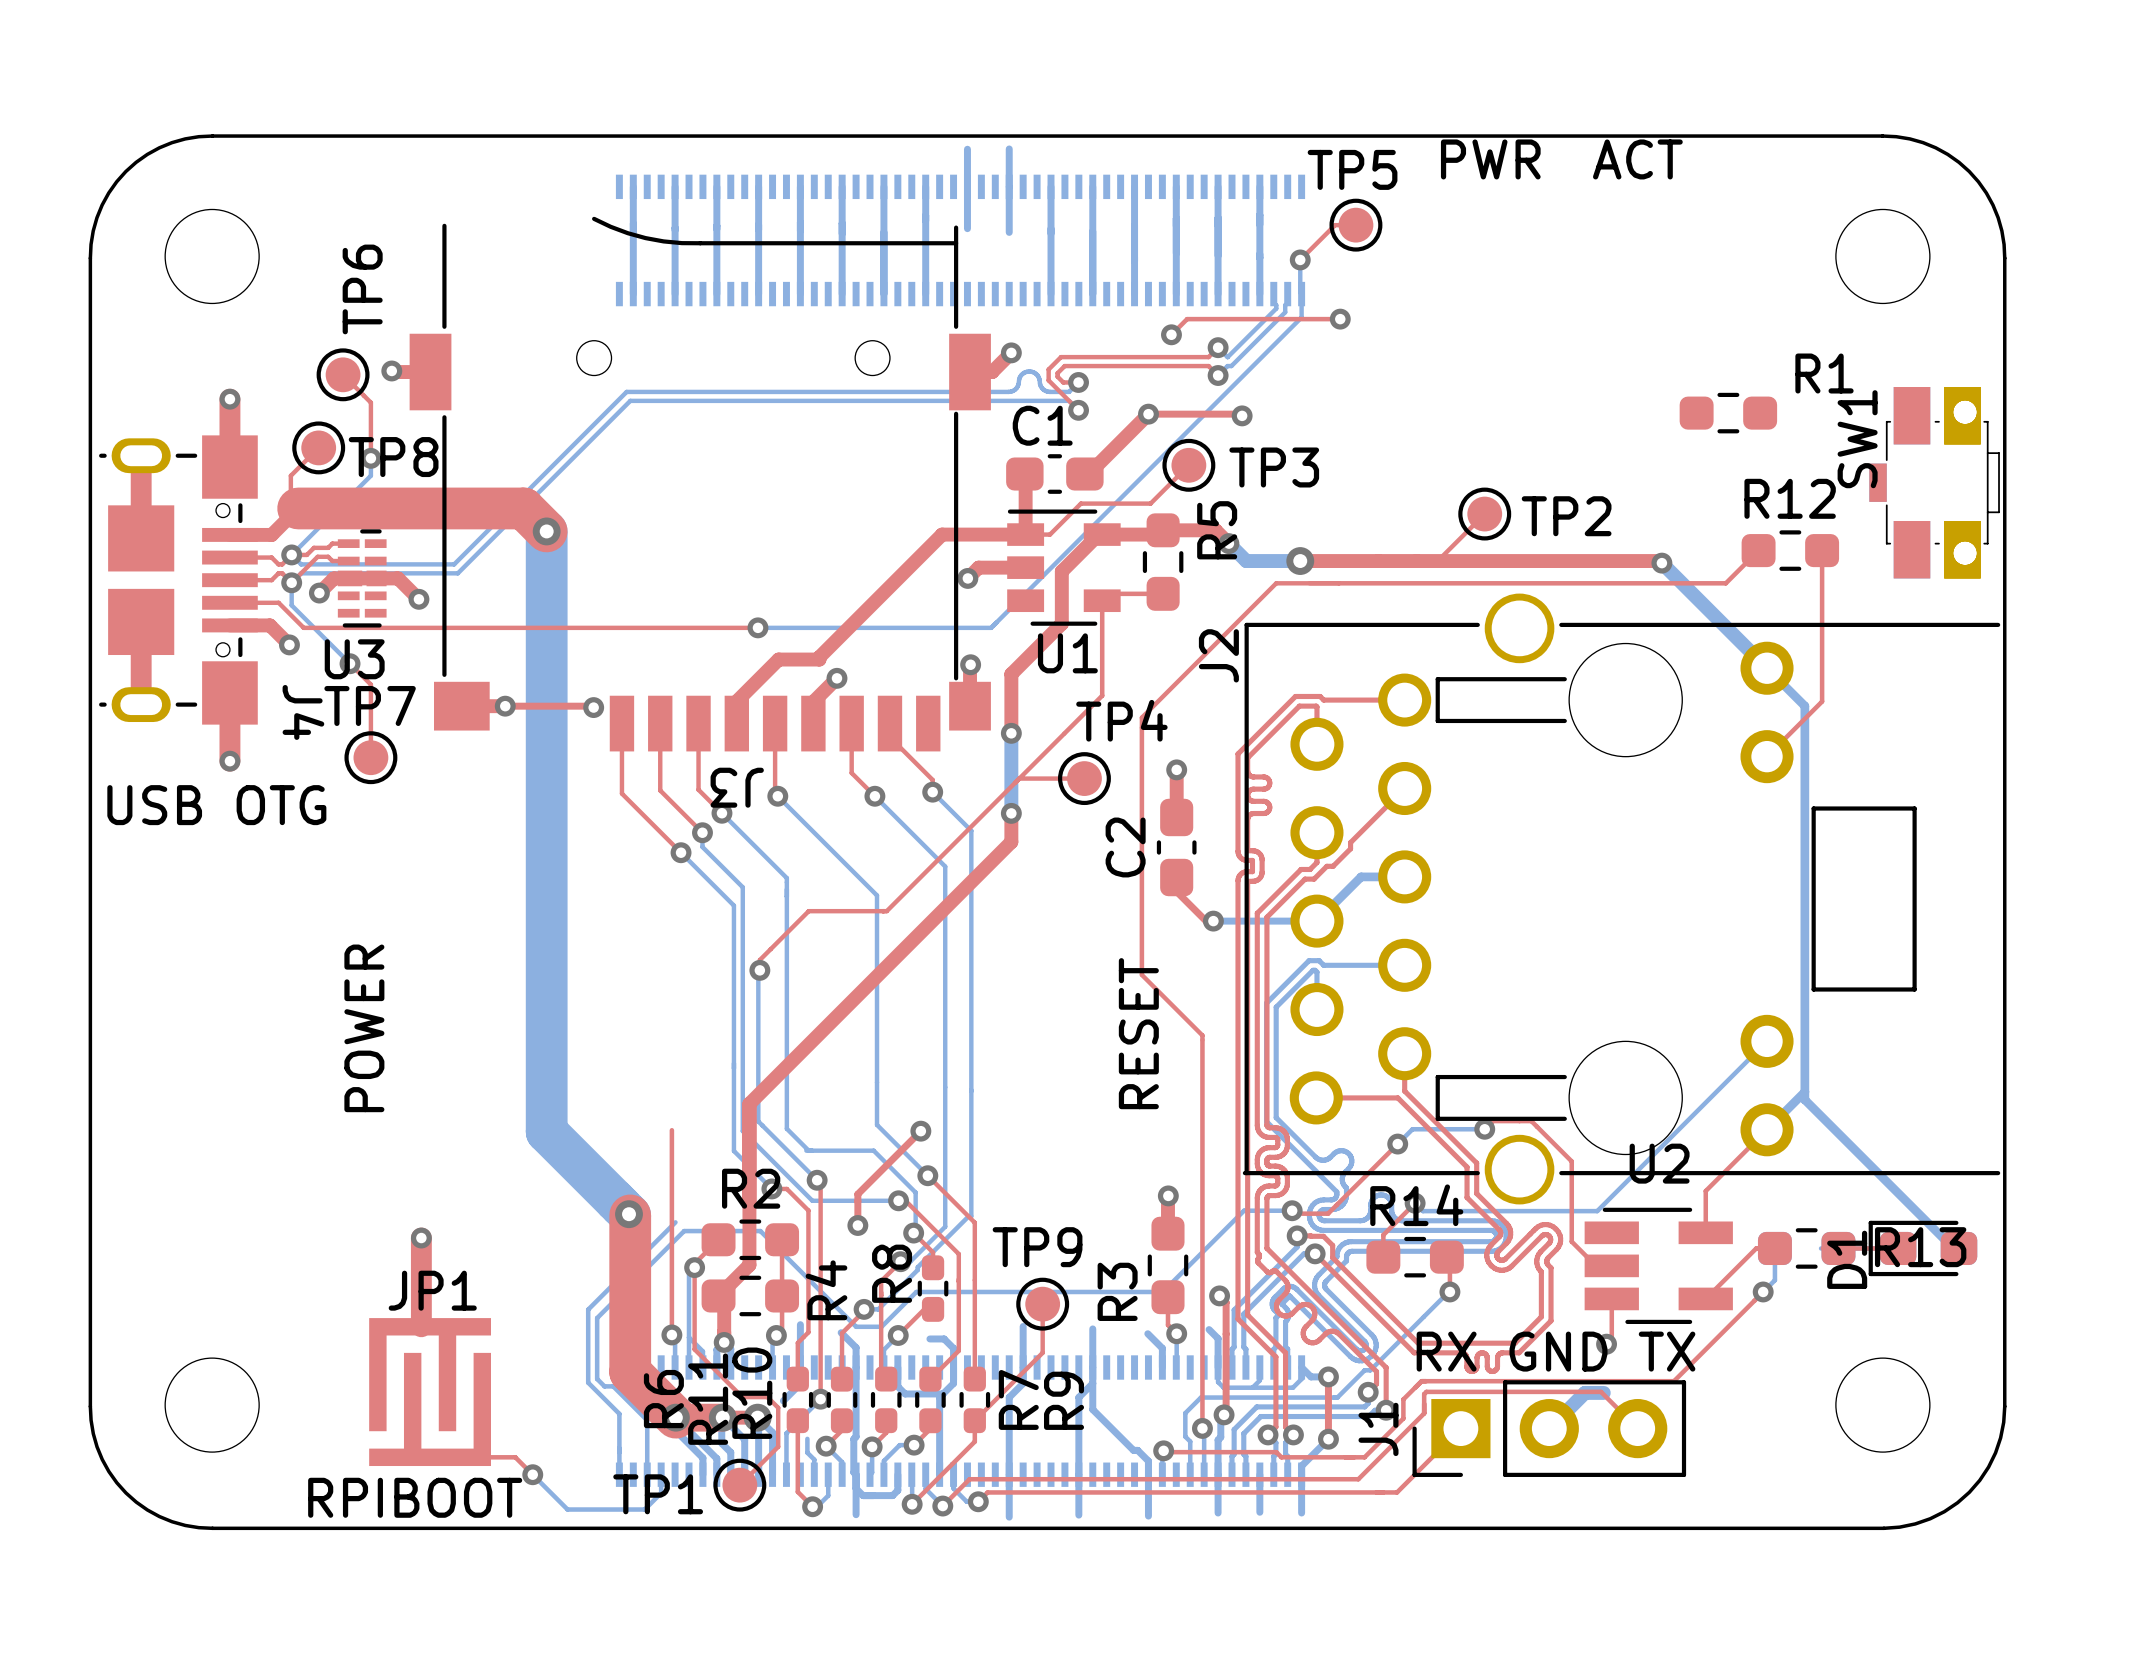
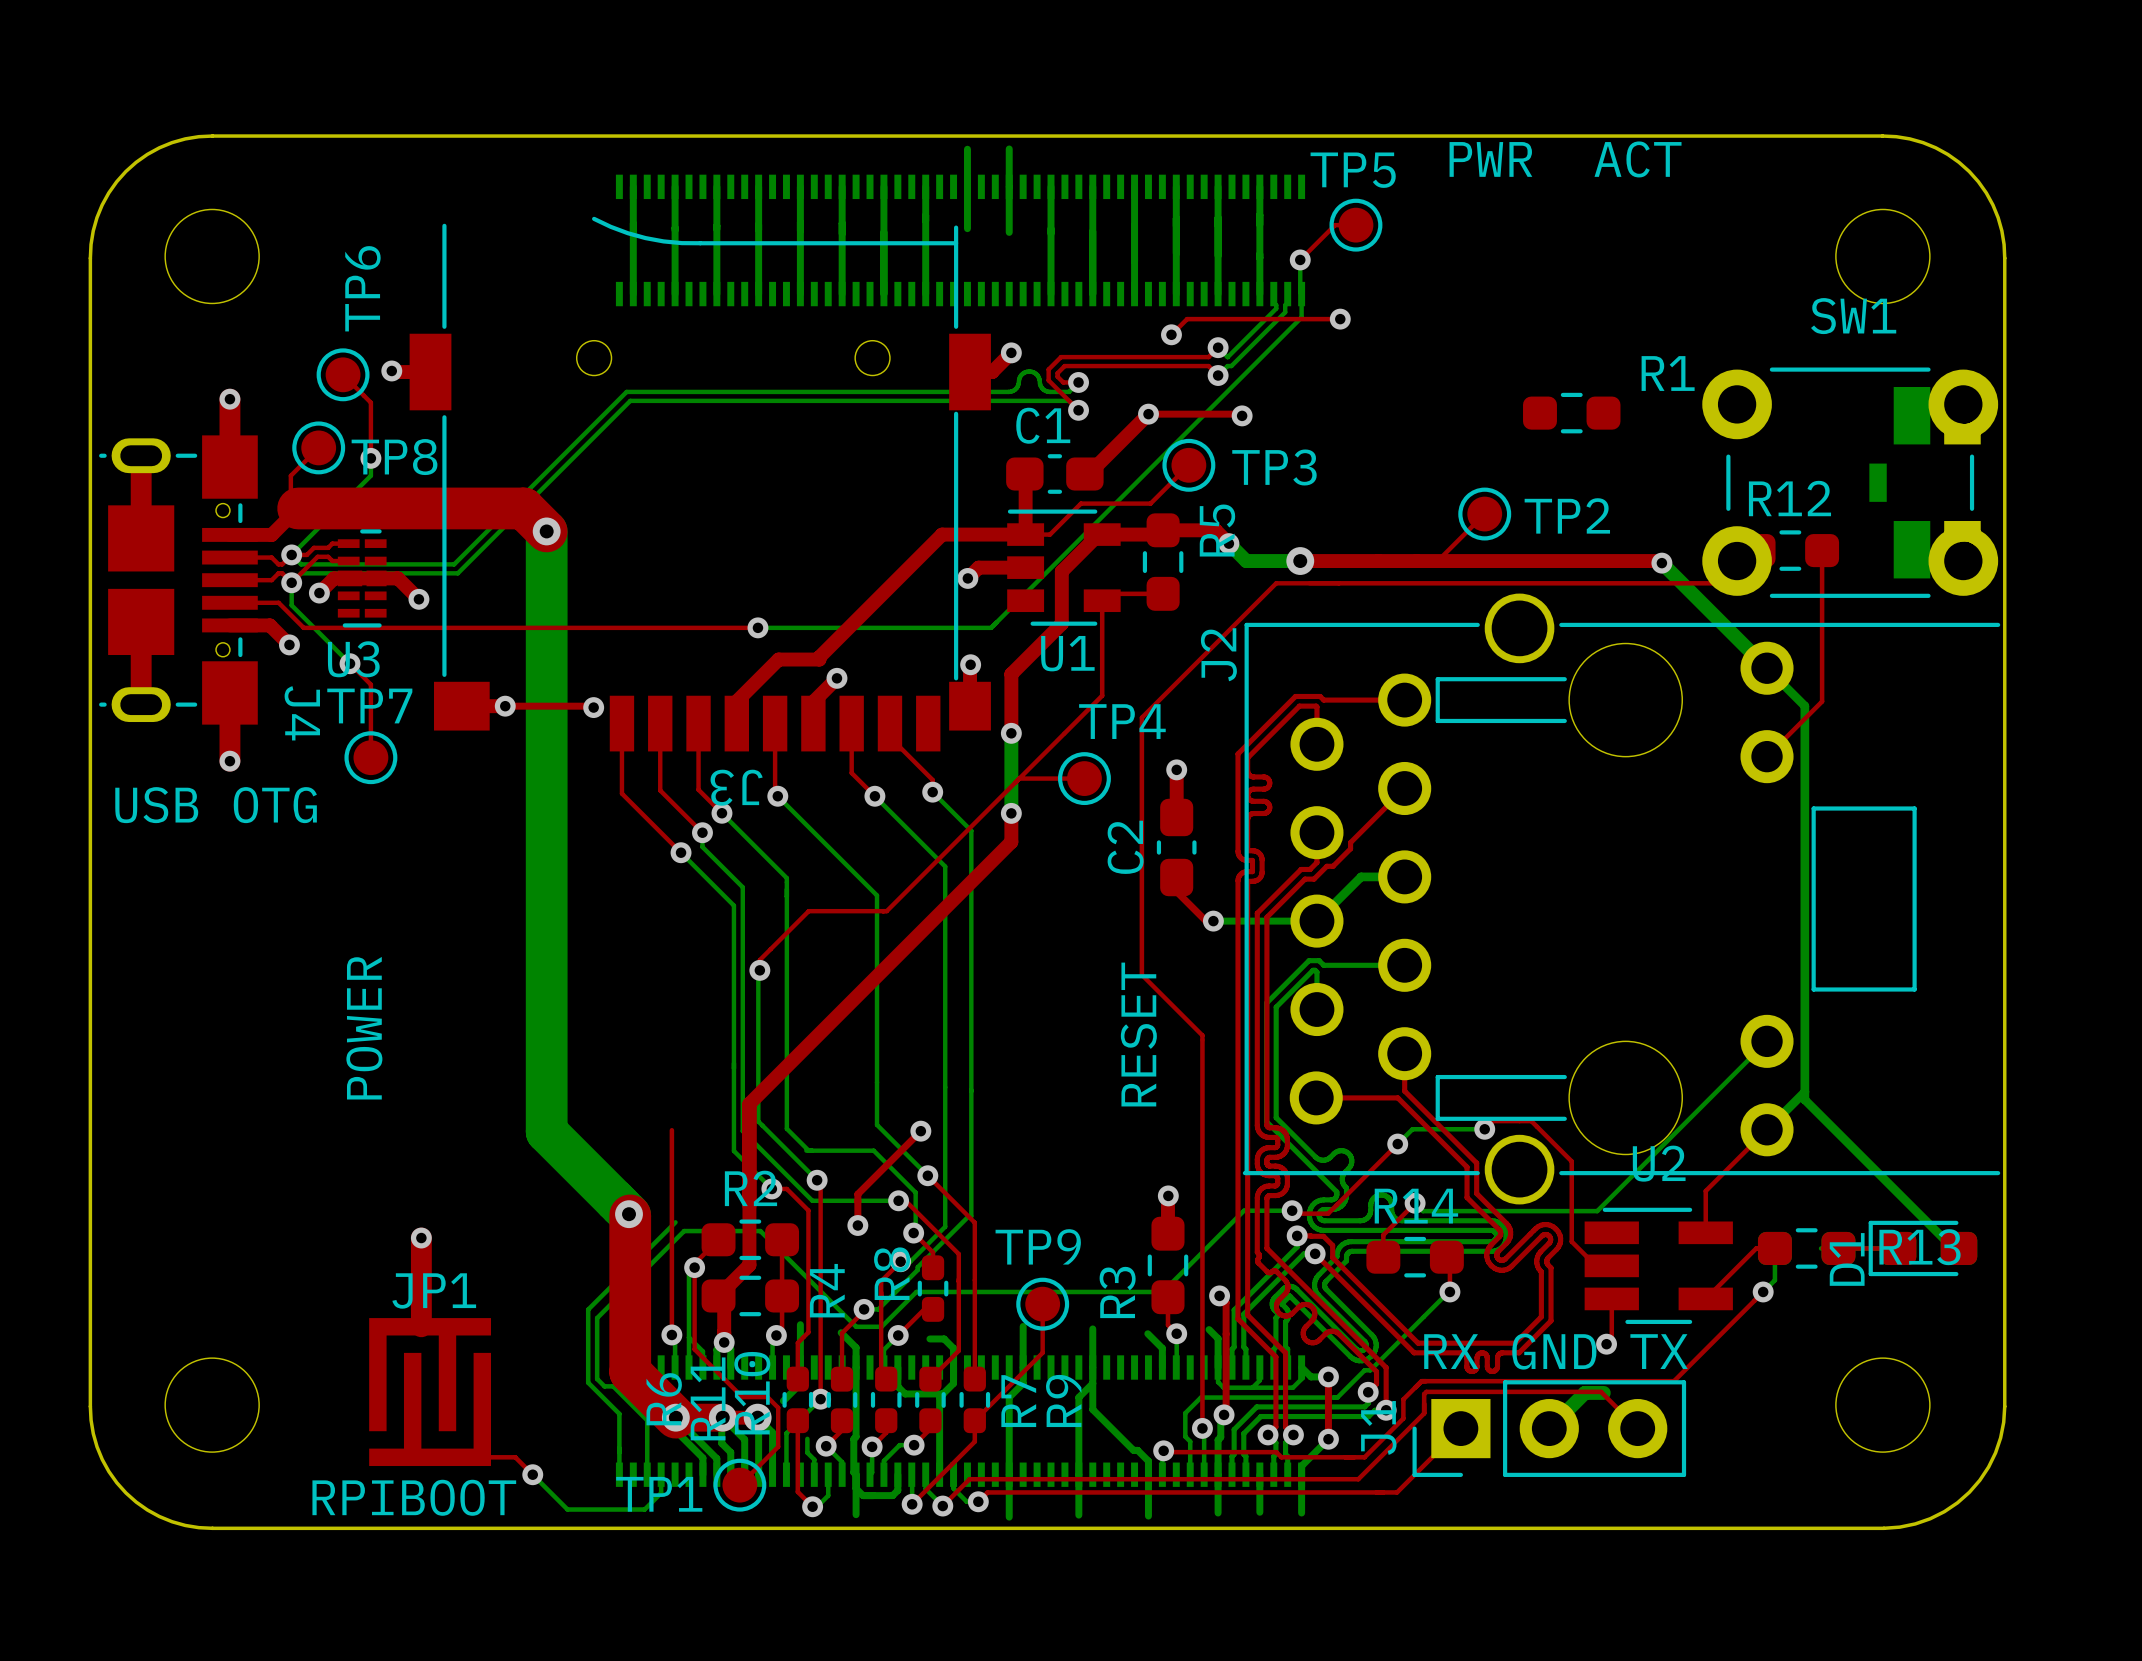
SW1 footprint: [1869, 386, 2000, 579] -> [1702, 367, 1999, 598]
R1 position: (1728, 413) -> (1571, 413)
SW1 name position: SW1 (1857, 439) -> SW1 (1853, 316)

